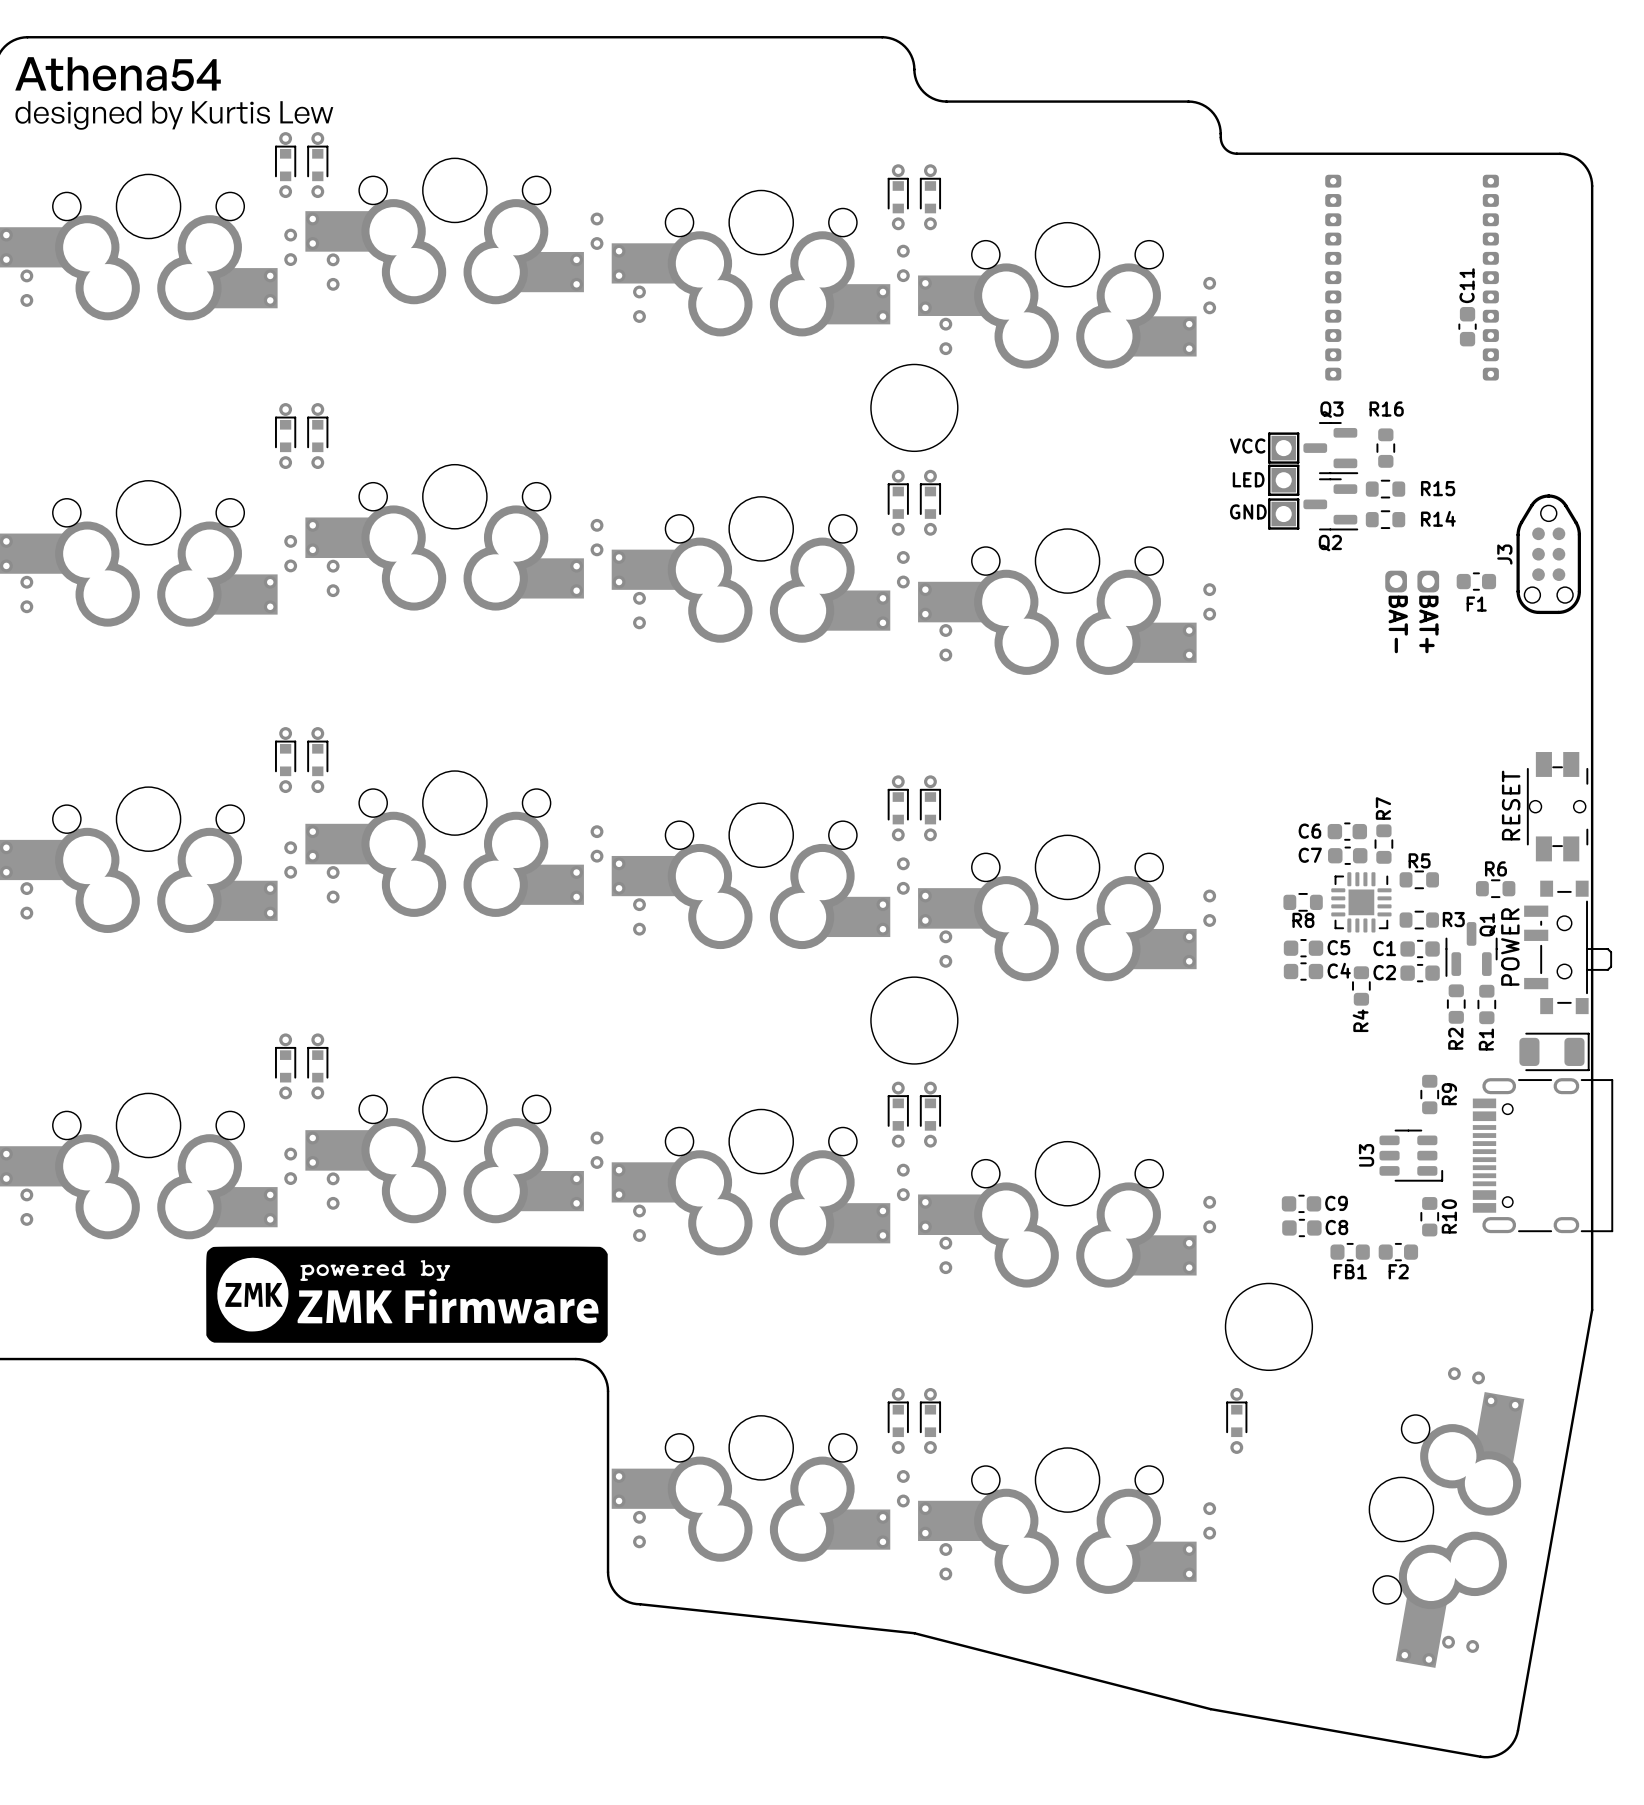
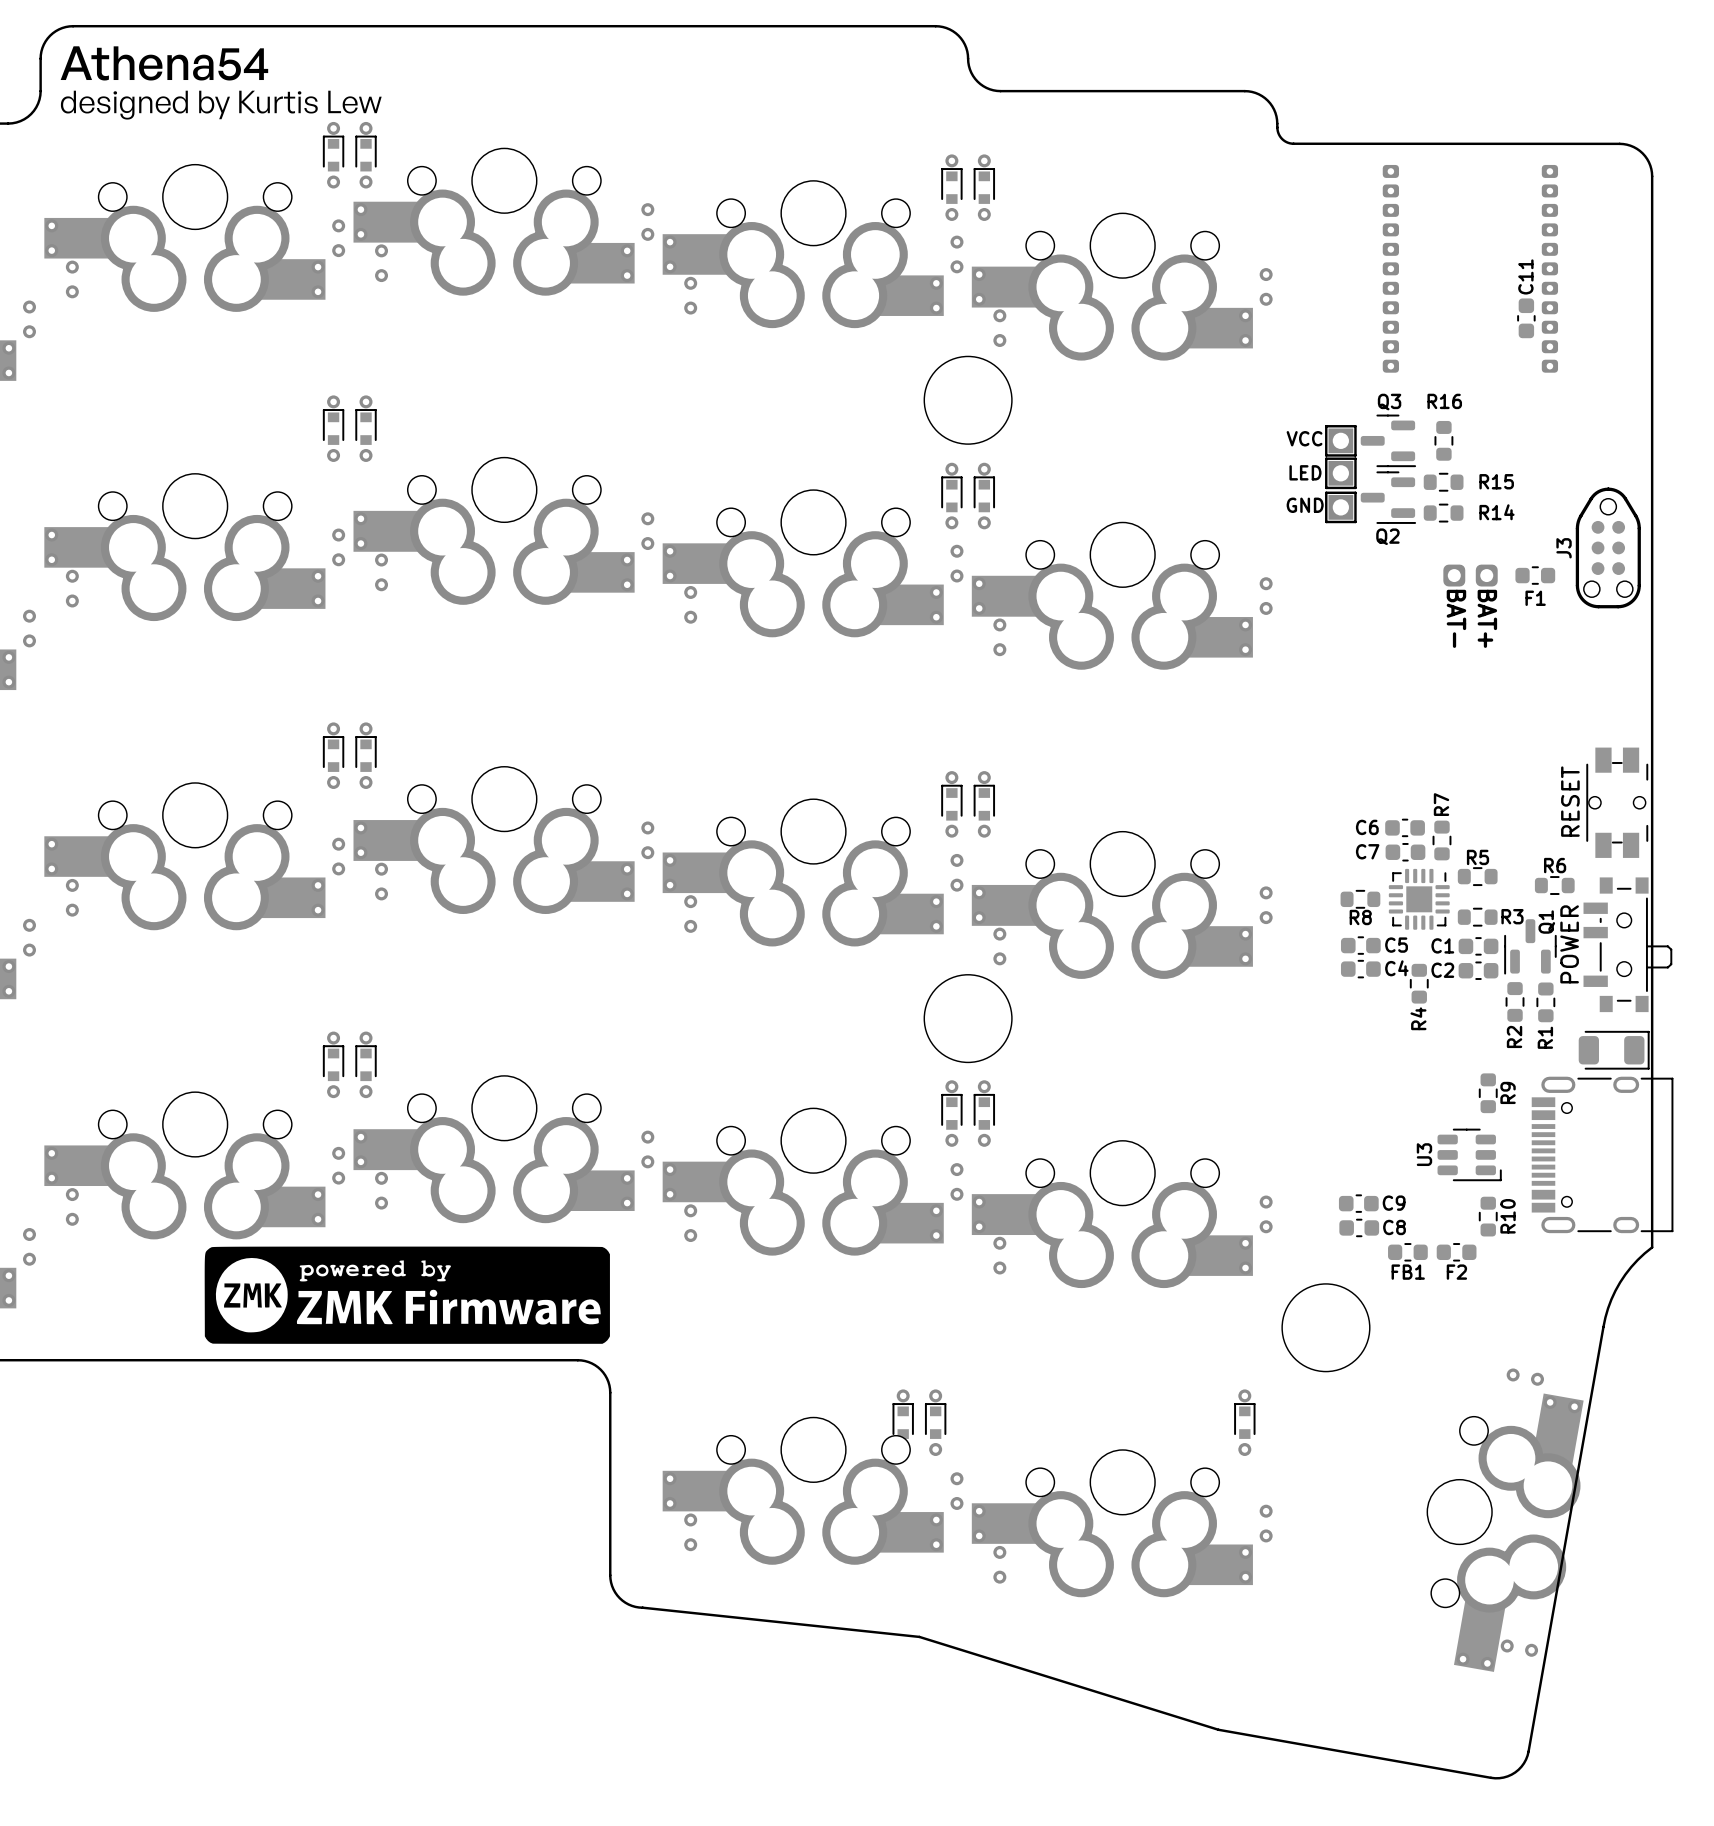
board edge: (1592, 185) (1592, 1310) (1517, 1730) (1510, 1746) (1498, 1754) (1480, 1756) (1210, 1709) (914, 1633) (629, 1602) (615, 1592) (608, 1575) (608, 1391) (604, 1377) (595, 1366) (583, 1359) (527, 1359) -> (1652, 176) (1652, 1247) (1631, 1267) (1620, 1282) (1605, 1317) (1528, 1751) (1521, 1766) (1507, 1776) (1490, 1777) (1218, 1729) (919, 1636) (639, 1607) (628, 1604) (617, 1595) (610, 1578) (609, 1385) (605, 1375) (598, 1367) (588, 1362) (577, 1360)
drawing position: (406, 1294) -> (407, 1295)
part position: (898, 1420) -> (935, 1422)
part position: (930, 1420) -> (903, 1422)
part position: (1236, 1420) -> (1244, 1422)

